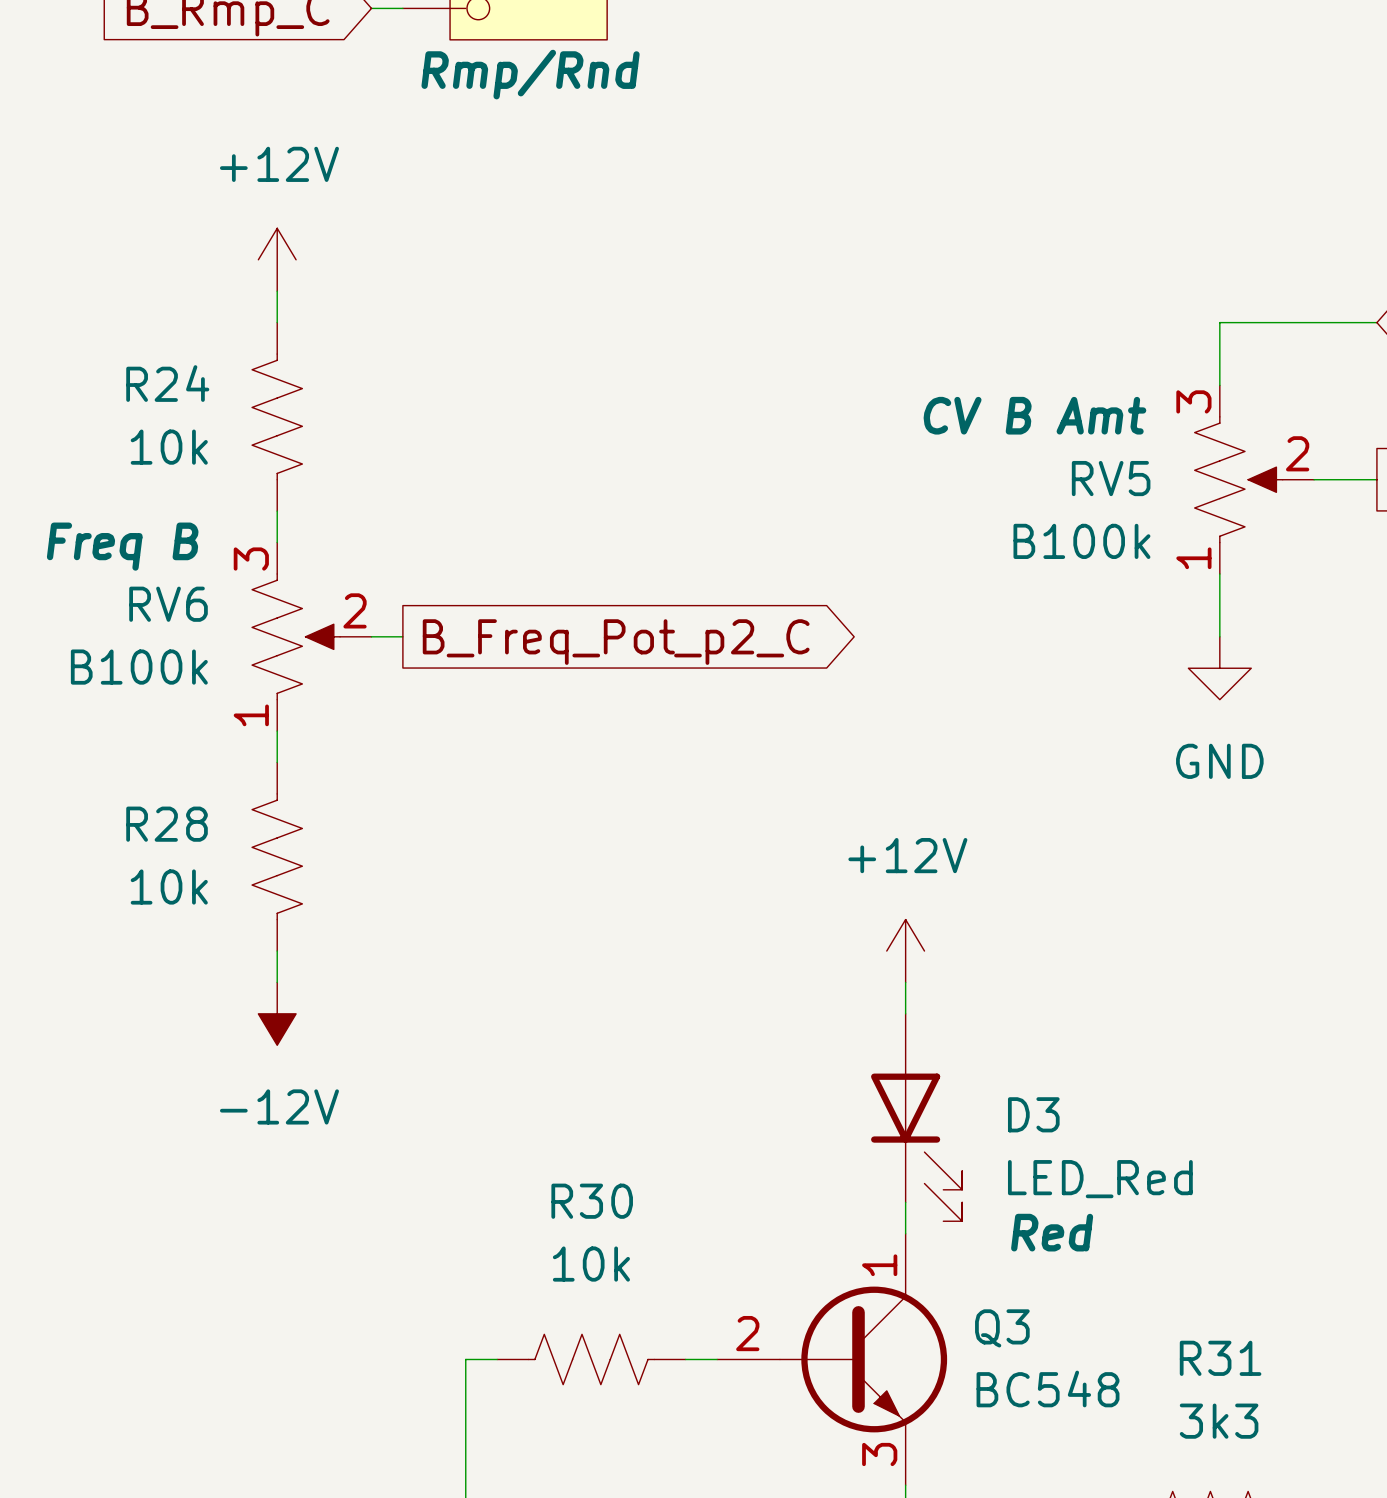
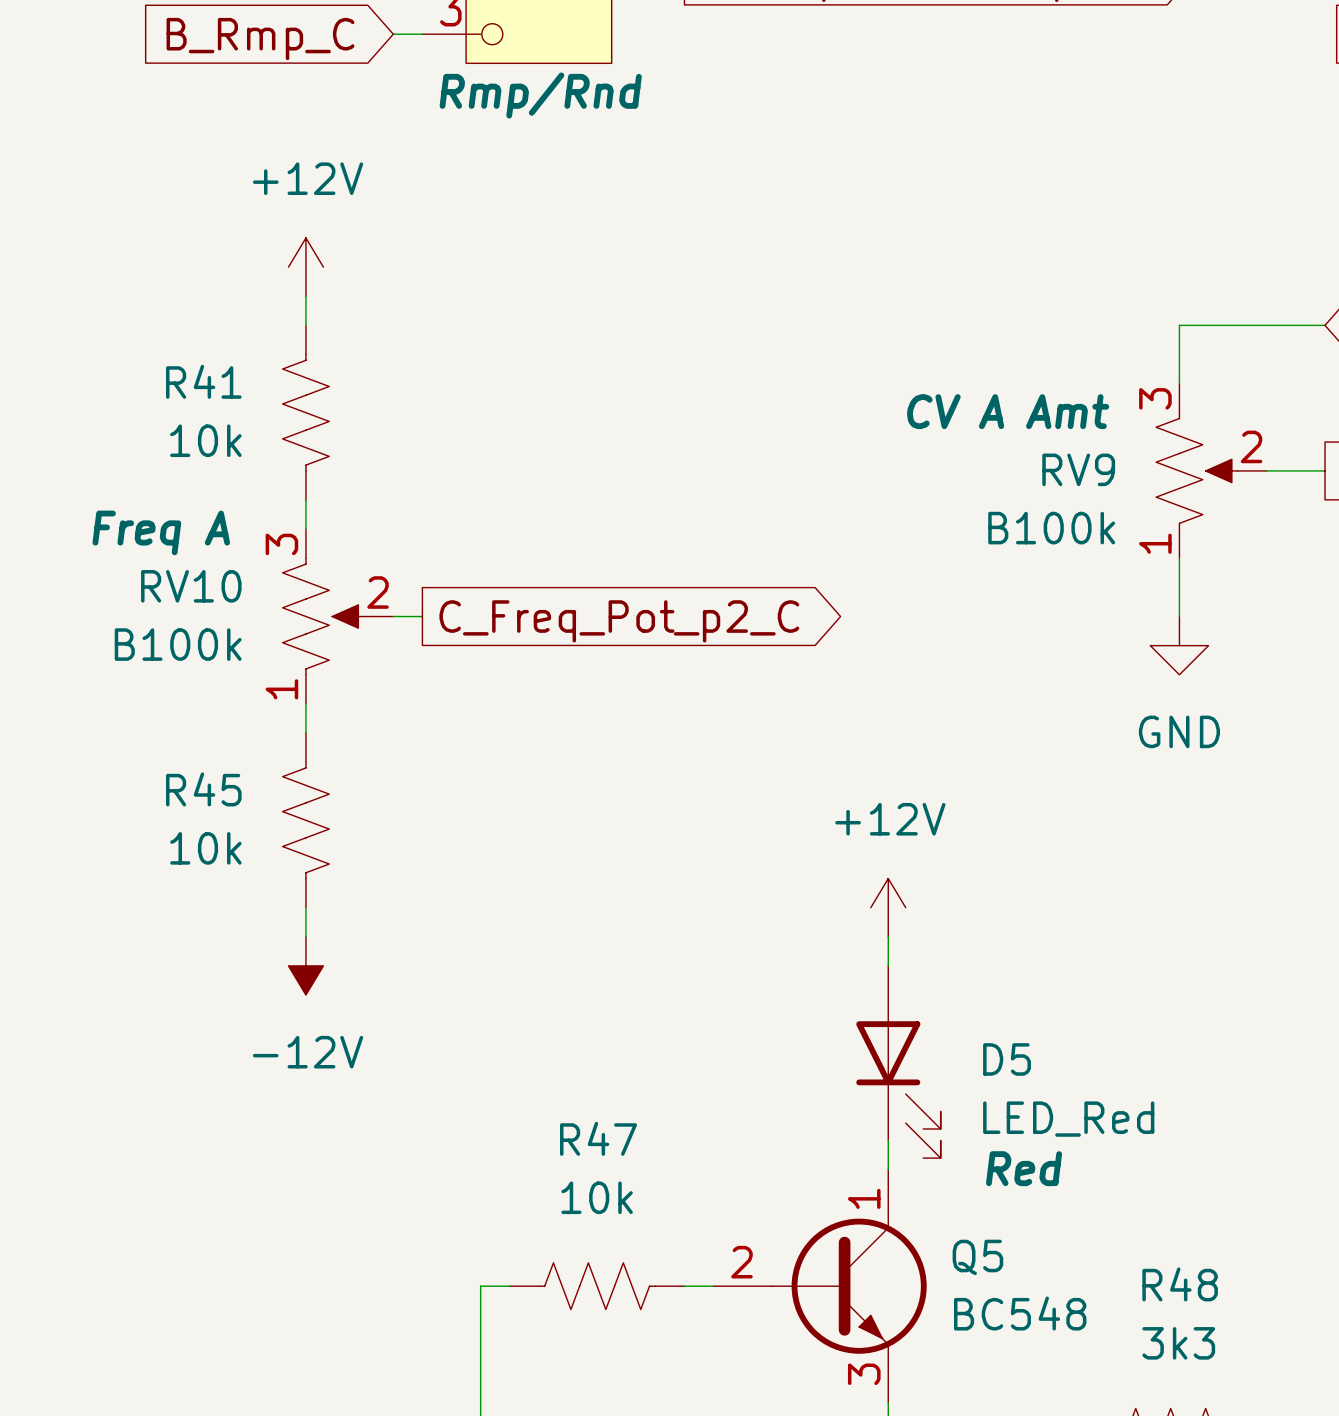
R24 name: R24 (167, 383) -> R41 (203, 381)
RV5 text: CV B Amt (1034, 415) -> CV A Amt (1008, 411)
RV5 name: RV5 (1111, 478) -> RV9 (1078, 469)
RV6 text: Freq B (122, 546) -> Freq A (161, 532)
RV6 name: RV6 (168, 604) -> RV10 (191, 586)
global label: B_Freq_Pot_p2_C (616, 642) -> C_Freq_Pot_p2_C (619, 621)
R28 name: R28 (167, 824) -> R45 (203, 789)
D3 name: D3 (1033, 1114) -> D5 (1007, 1059)
R30 name: R30 (592, 1201) -> R47 (598, 1138)
Q3 name: Q3 (1002, 1328) -> Q5 (977, 1257)
R31 name: R31 (1220, 1358) -> R48 (1180, 1284)

